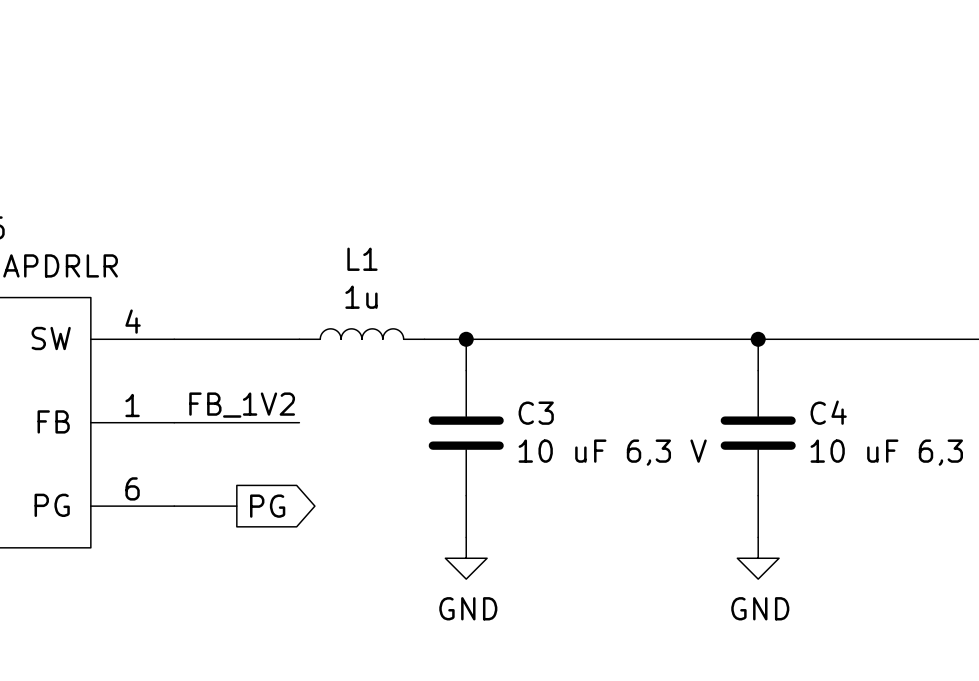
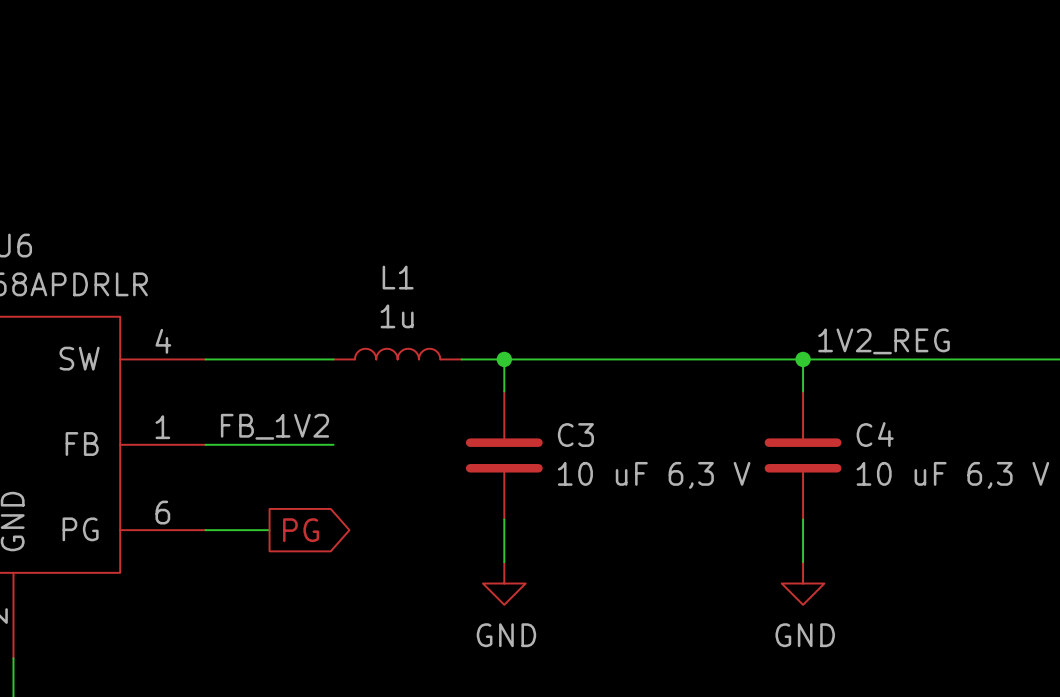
label: none -> 1V2_REG (884, 341)

